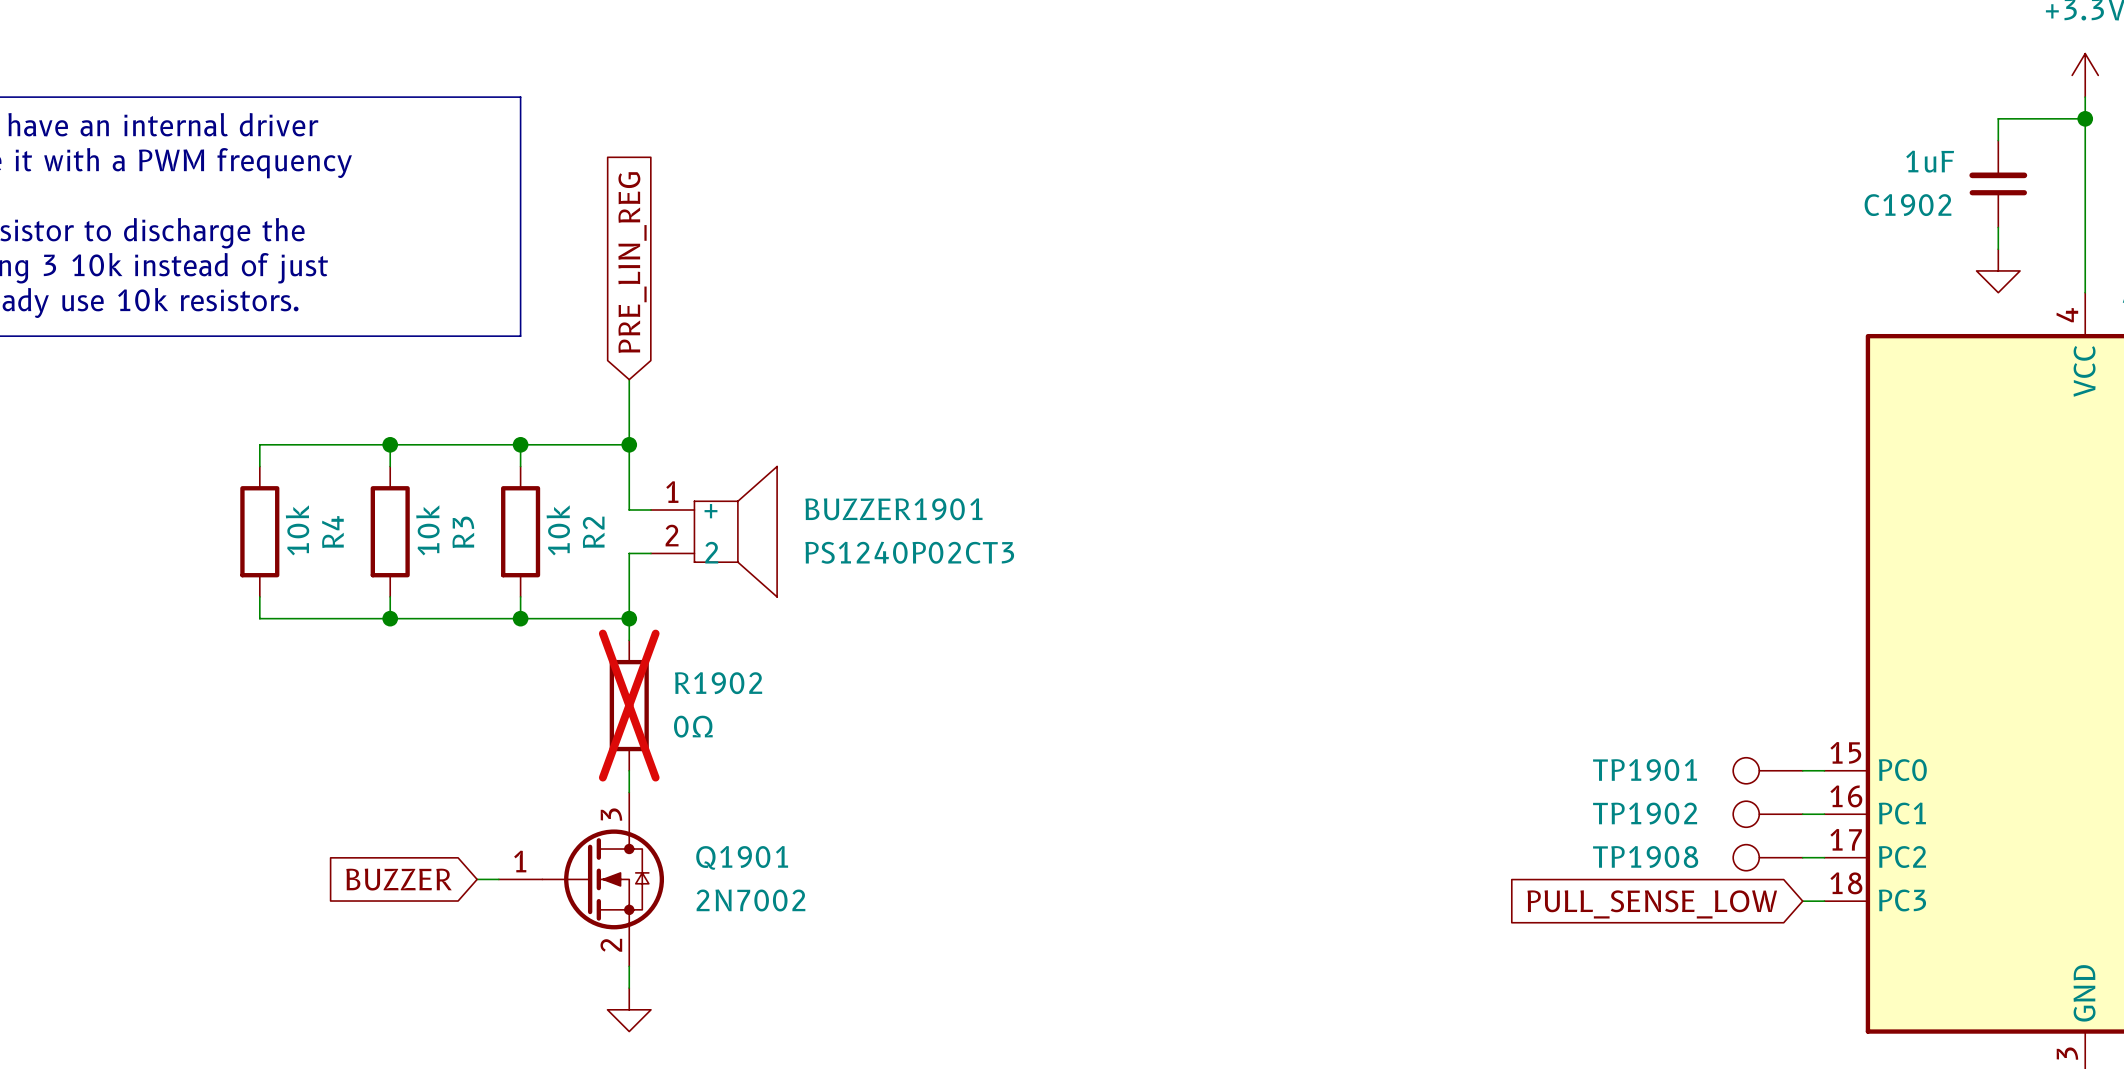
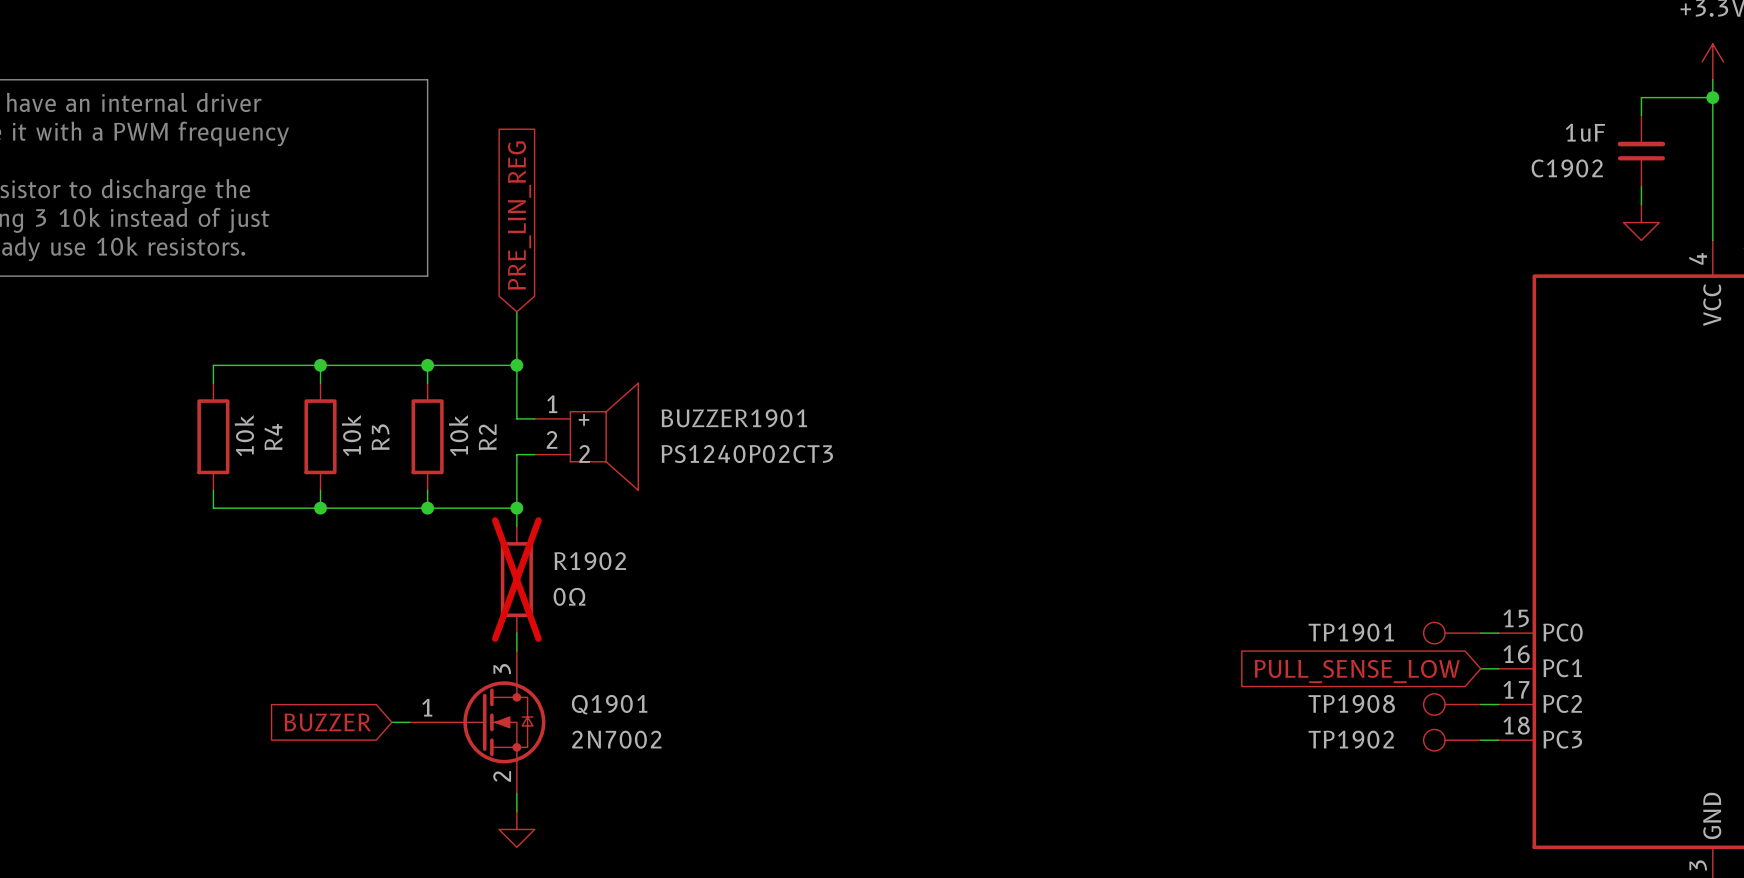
TP1902 position: (1767, 814) -> (1452, 740)
global label position: PULL_SENSE_LOW (1652, 904) -> PULL_SENSE_LOW (1357, 671)

